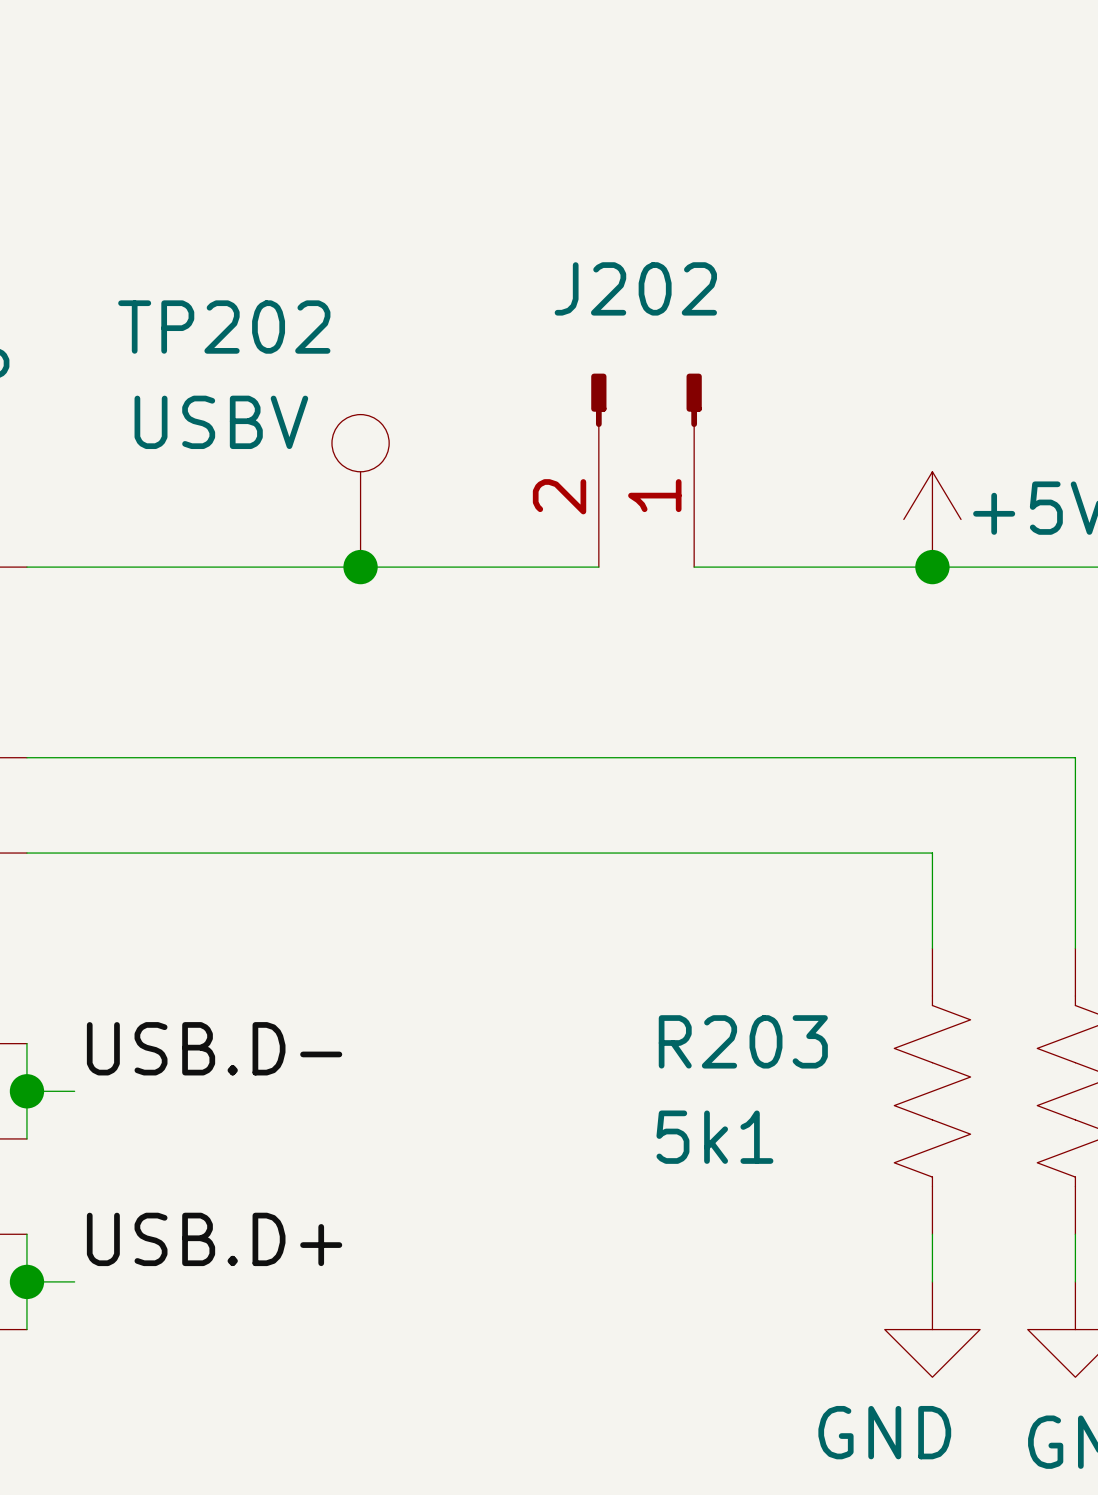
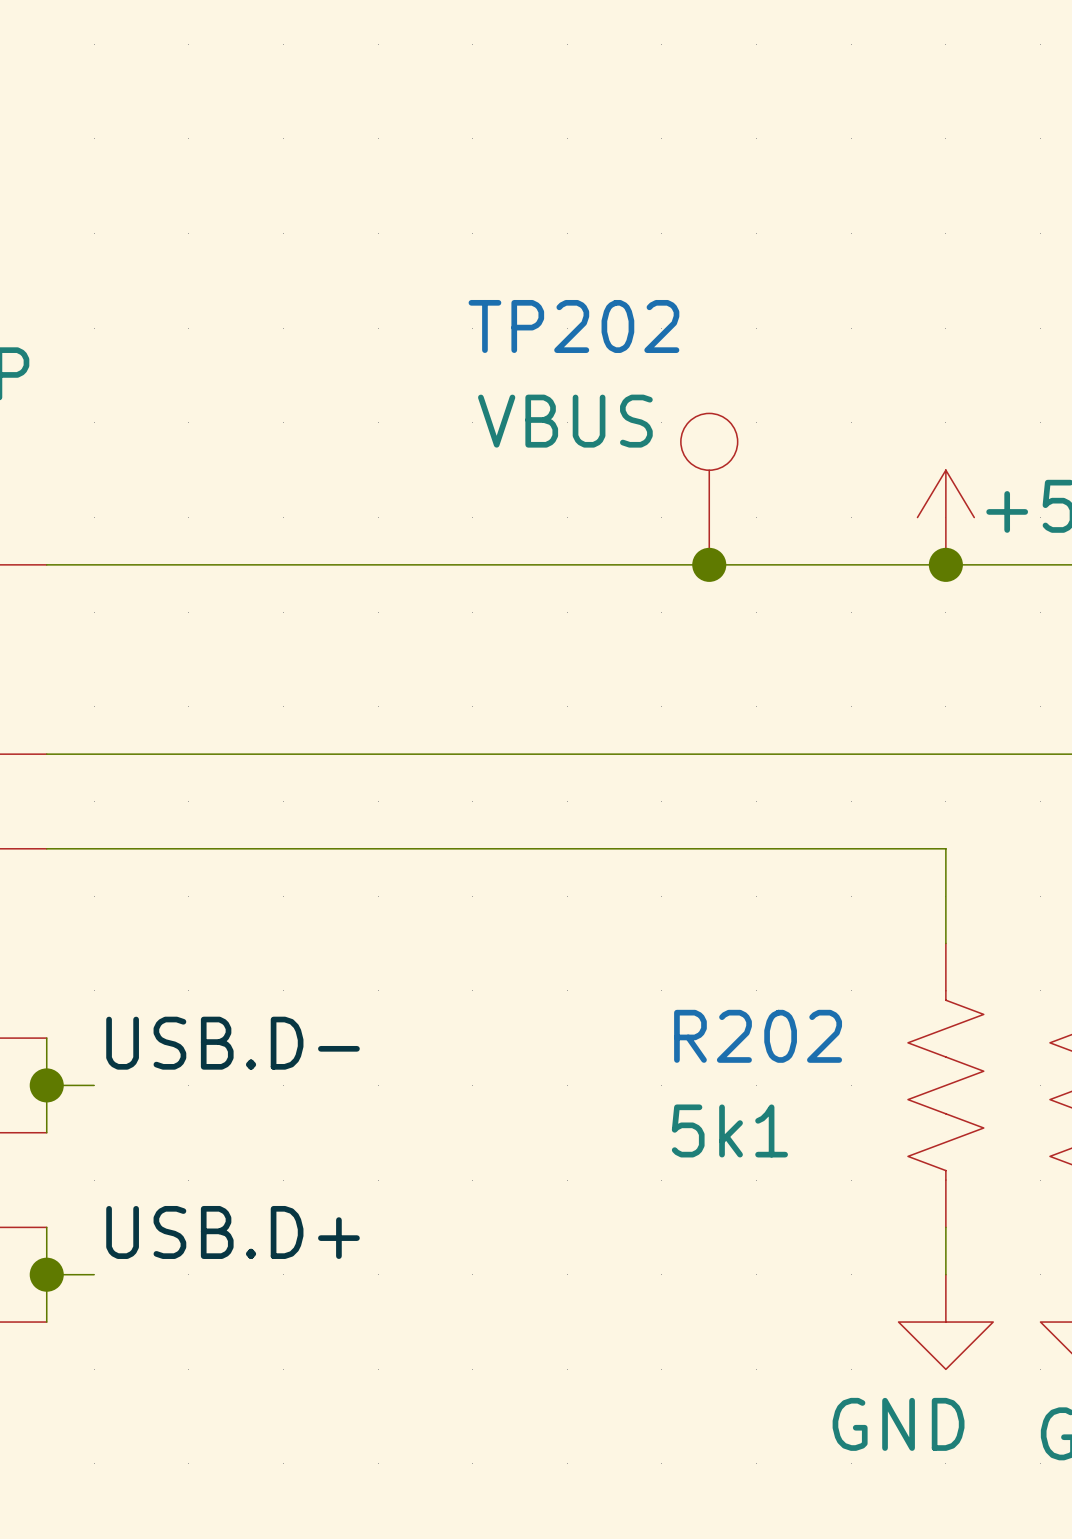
TP202 value: USBV (221, 422) -> VBUS (565, 421)
J202: (646, 470) -> none
TP202 position: (360, 490) -> (709, 489)
junction: (360, 567) -> none
wire: none -> (614, 564) (709, 564)
junction: none -> (709, 564)
R203 name: R203 (743, 1041) -> R202 (758, 1036)

